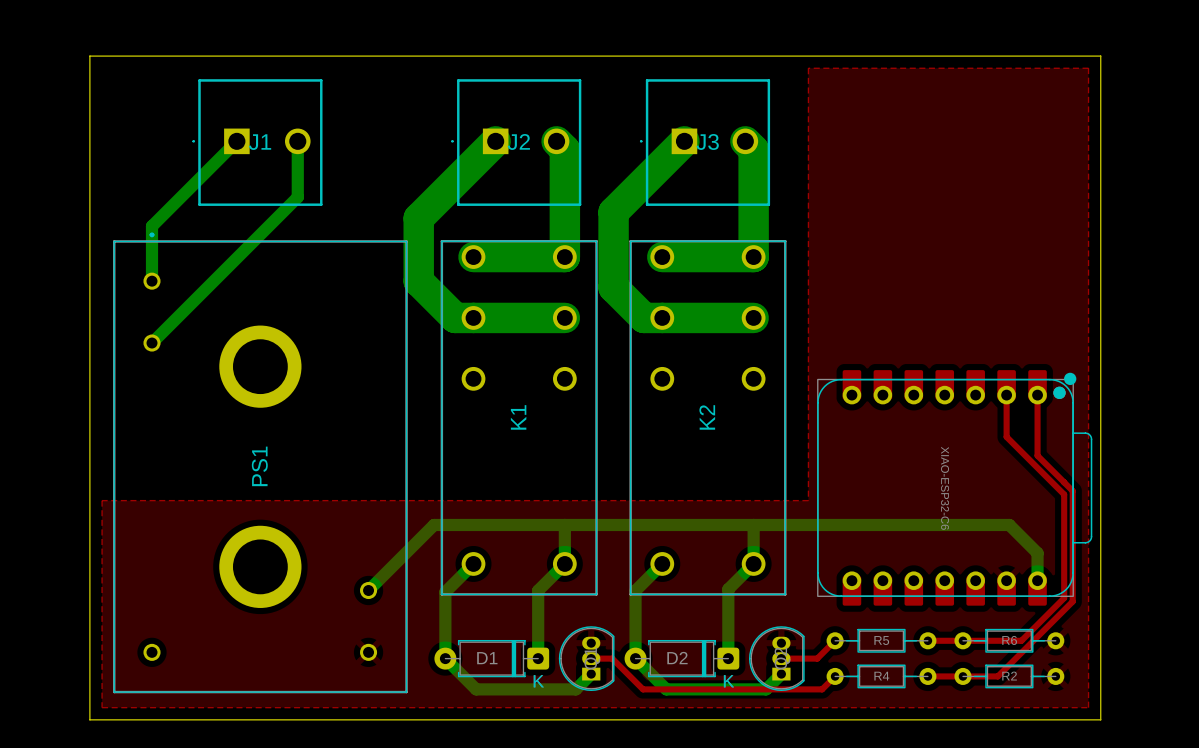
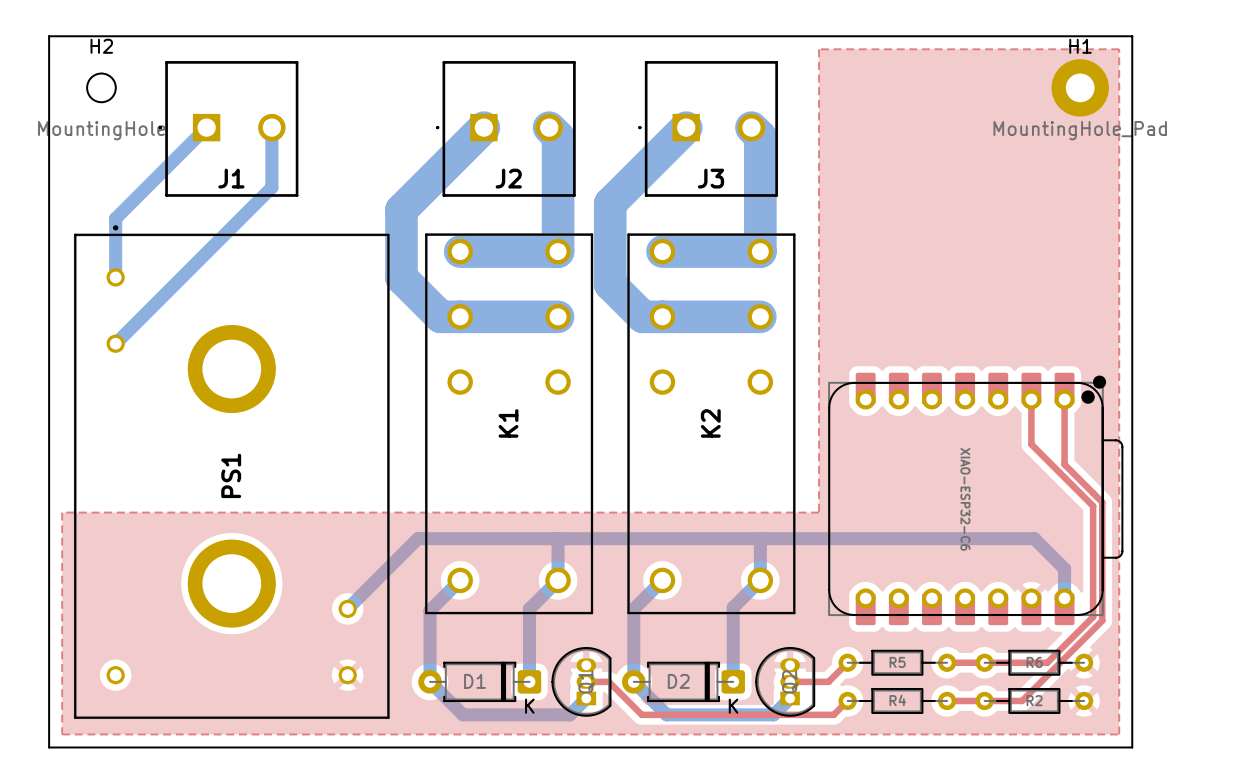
H2: none -> MountingHole (101, 87)
H1: none -> MountingHole_Pad (1080, 87)
J2 name position: J2 (518, 141) -> J2 (508, 178)
J3 name position: J3 (707, 141) -> J3 (711, 178)
J1 name position: J1 (260, 142) -> J1 (231, 178)

